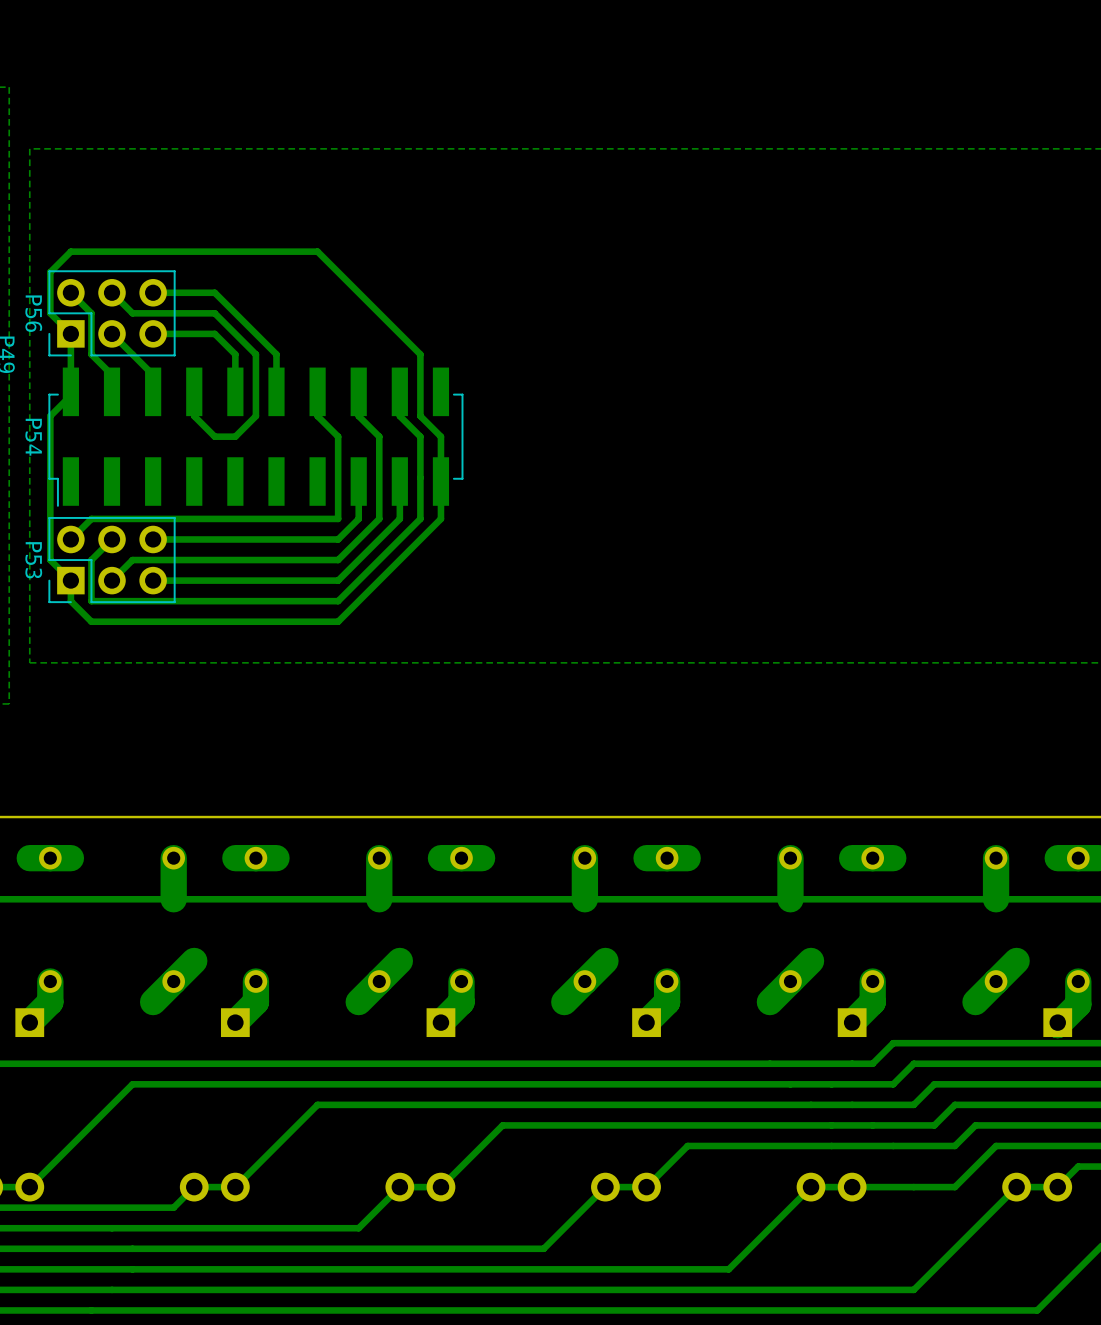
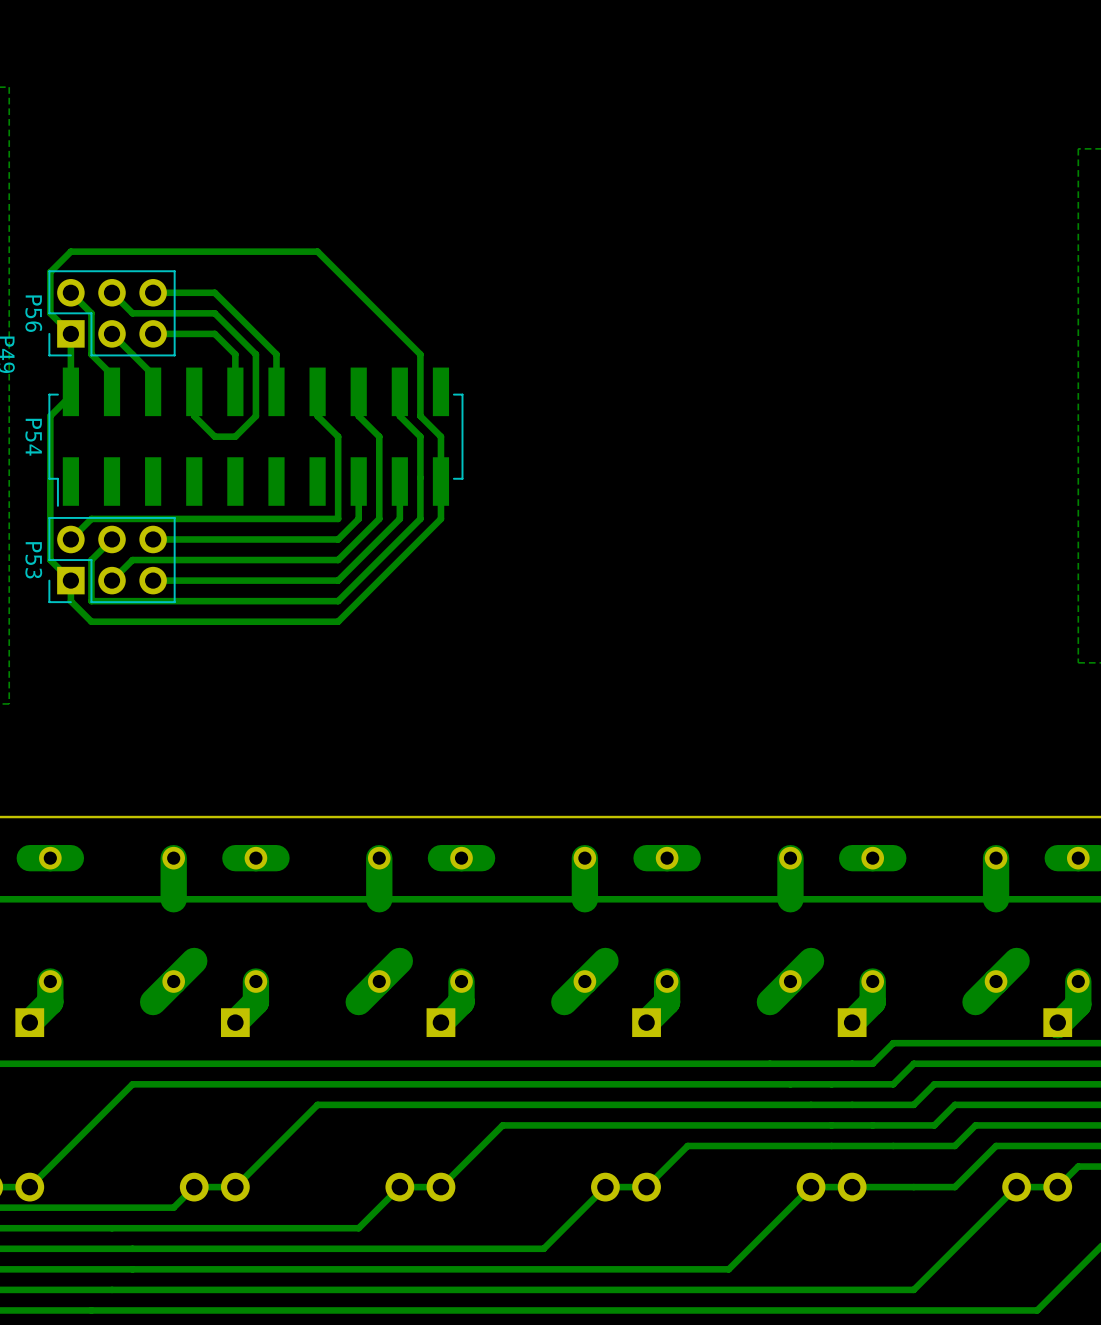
bottom zone outline: (1078, 148) (29, 148) (29, 662) (1078, 662) -> (1078, 148) (1078, 662)

